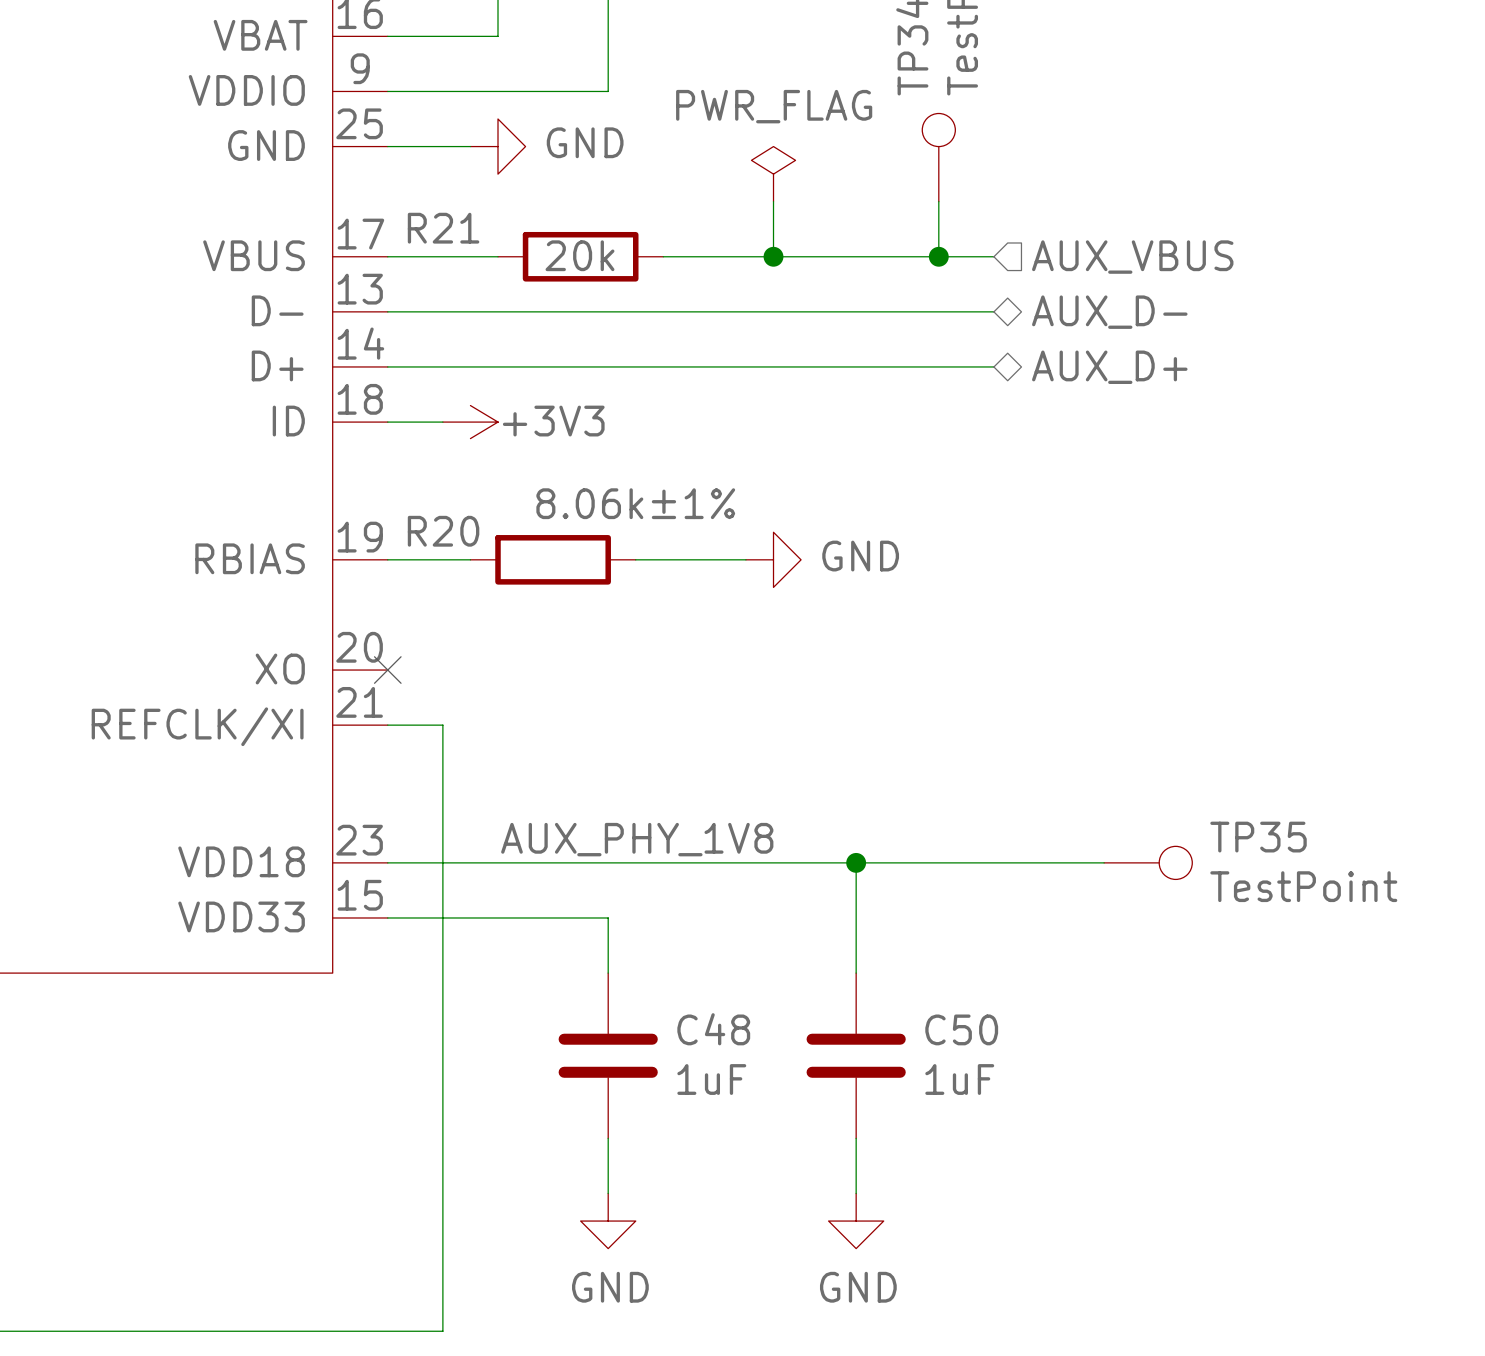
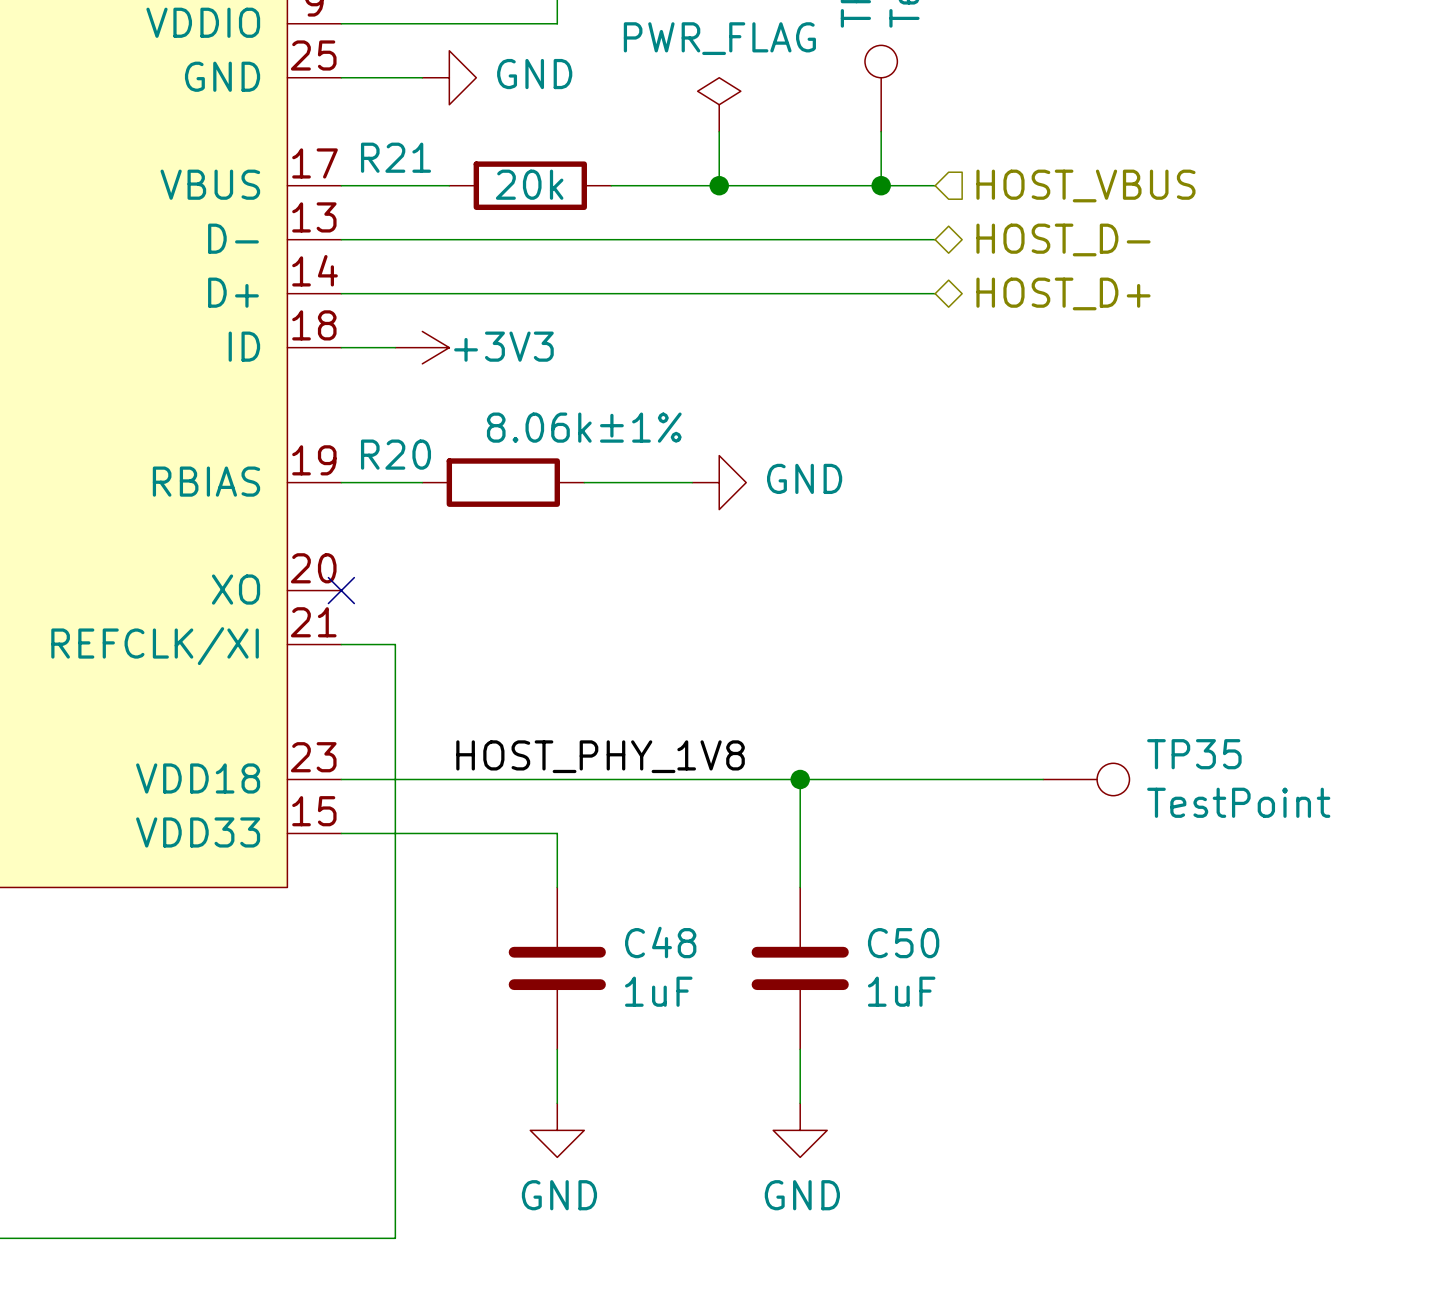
hierarchical label: AUX_VBUS (1132, 257) -> HOST_VBUS (1085, 185)
hierarchical label: AUX_D- (1109, 312) -> HOST_D- (1063, 239)
hierarchical label: AUX_D+ (1109, 367) -> HOST_D+ (1063, 293)
label: AUX_PHY_1V8 (637, 839) -> HOST_PHY_1V8 (600, 756)

